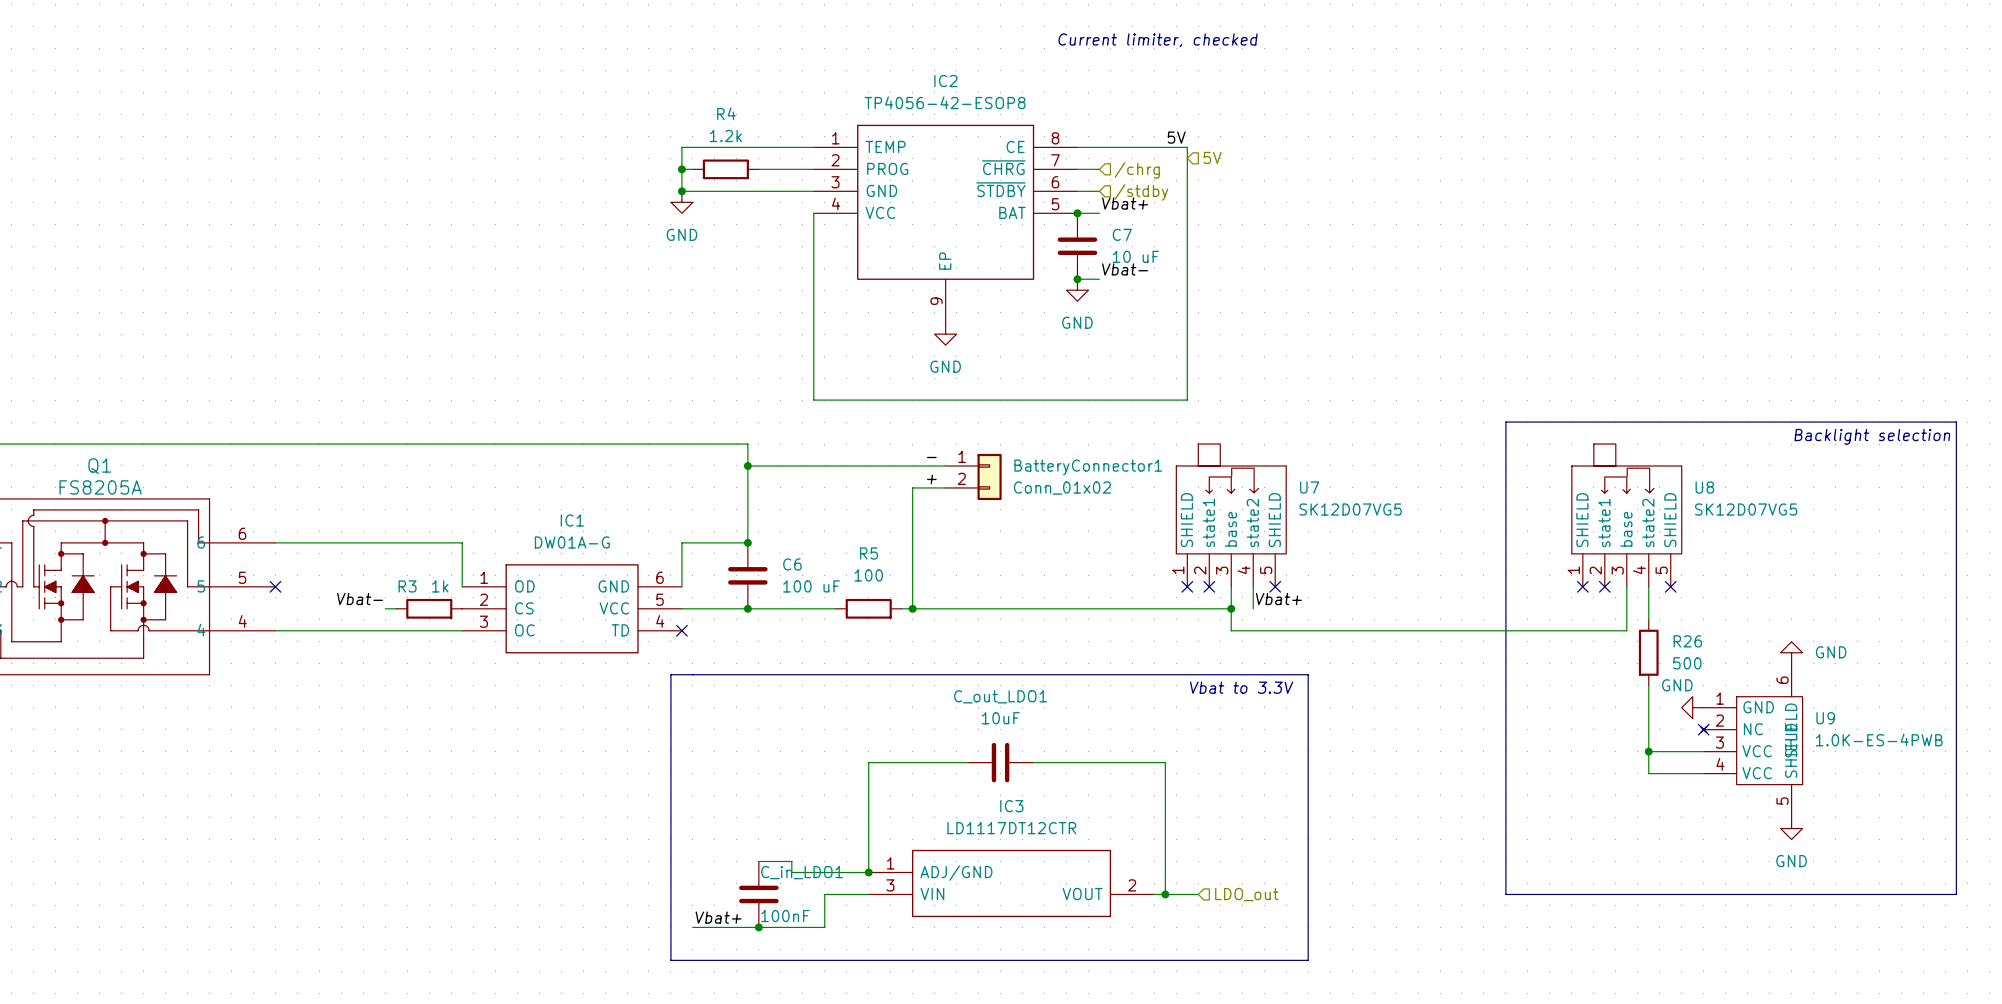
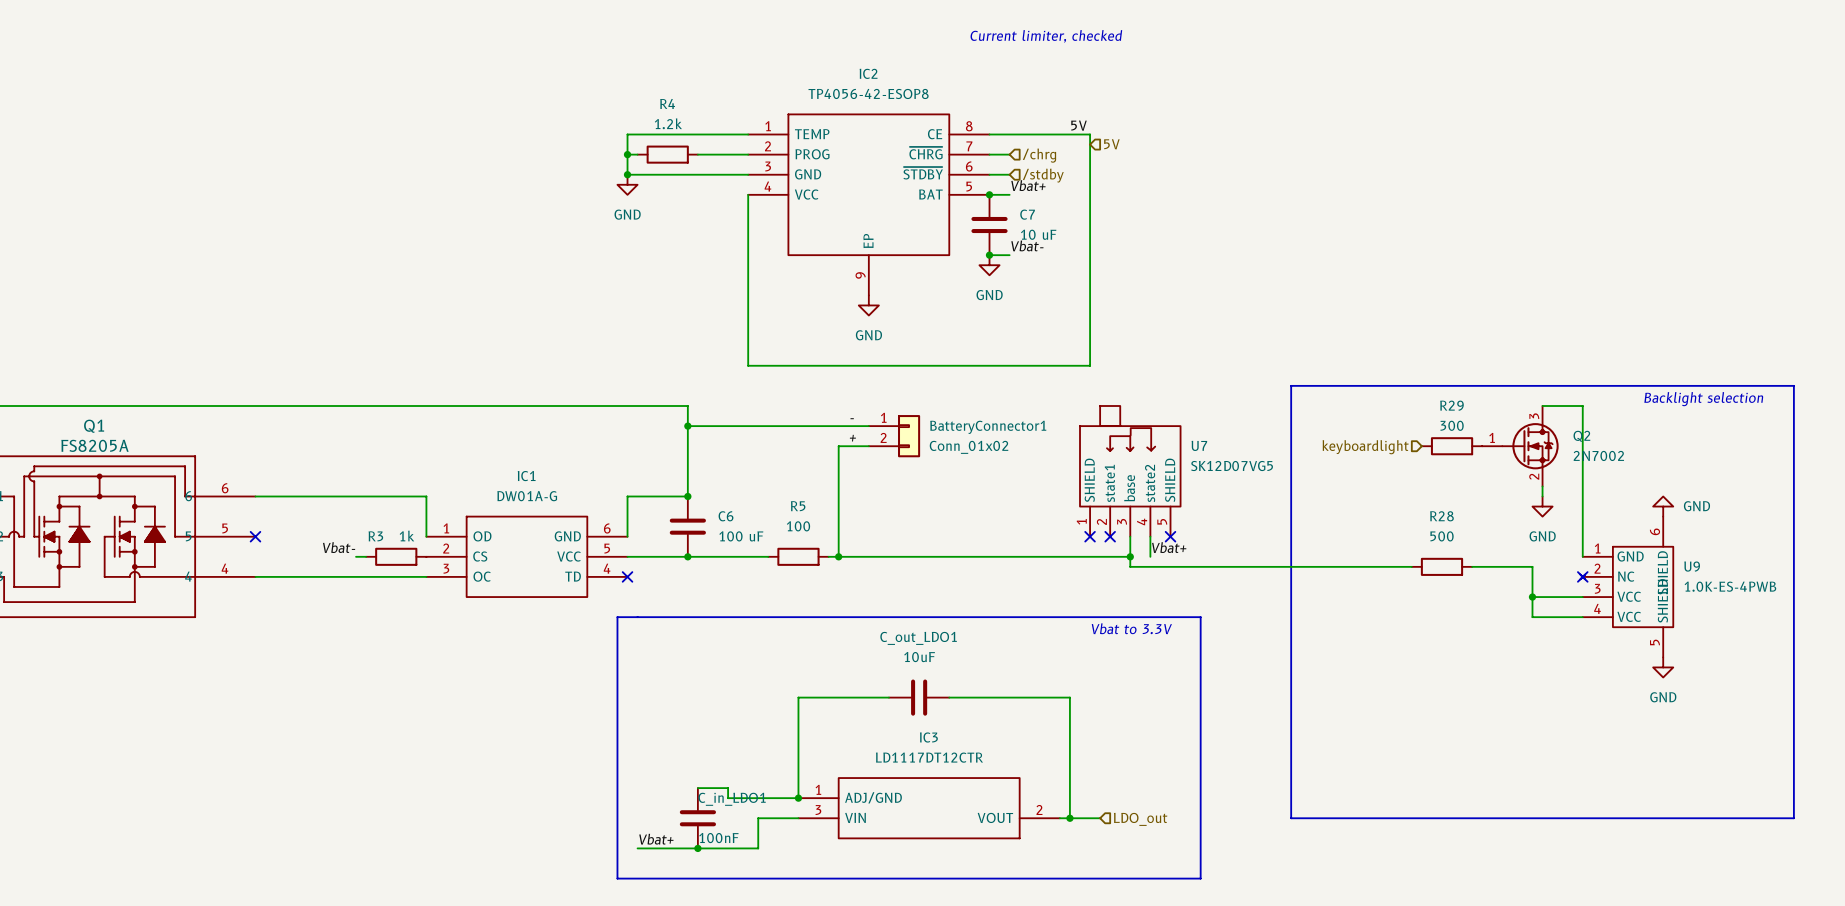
line: (1505, 422) (1505, 894) -> (1381, 385) (1291, 385) (1291, 818) (1381, 818)
wire: none -> (1542, 405) (1582, 405) (1582, 556)
R29: none -> 300 (1452, 446)
Q2: none -> 2N7002 (1520, 446)
hierarchical label: none -> keyboardlight (1365, 447)
U8: SK12D07VG5 (1626, 515) -> none
power symbol: none -> GND (1542, 506)
power symbol: none -> GND (1663, 506)
no-connect mark: (1582, 586) -> none
no-connect mark: (1604, 586) -> none
wire: (1626, 586) (1626, 630) (1231, 630) (1231, 619) -> (1411, 566) (1130, 566)
wire: (1648, 586) (1648, 619) -> none
no-connect mark: (1670, 586) -> none
R28: none -> 500 (1441, 566)
wire: none -> (1472, 566) (1532, 566) (1532, 617) (1582, 617)
no-connect mark: none -> (1582, 576)
R26: 500 (1648, 652) -> none
junction: none -> (1532, 597)
power symbol: GND (1791, 652) -> none
wire: (1648, 685) (1648, 773) (1703, 773) -> none
power symbol: GND (1692, 707) -> none
no-connect mark: (1703, 729) -> none
power symbol: none -> GND (1663, 667)
U9 position: (1751, 740) -> (1626, 586)
wire: (1648, 751) (1703, 751) -> (1532, 597) (1582, 597)
junction: (1648, 751) -> none
power symbol: GND (1791, 828) -> none

